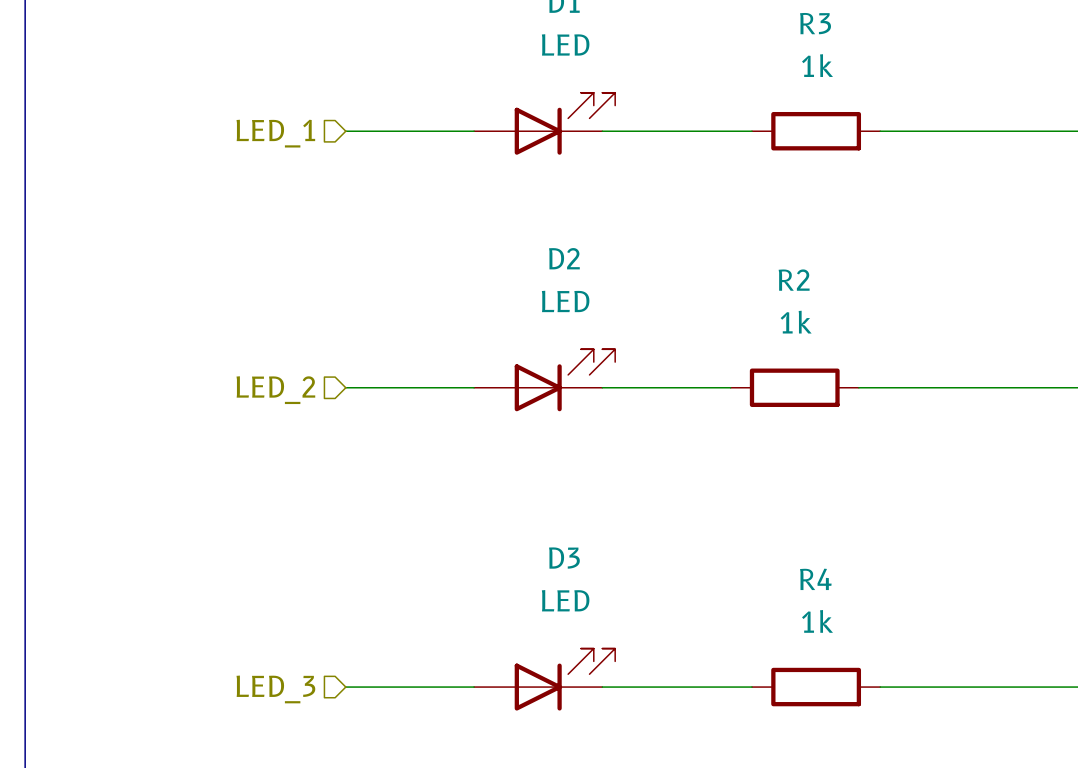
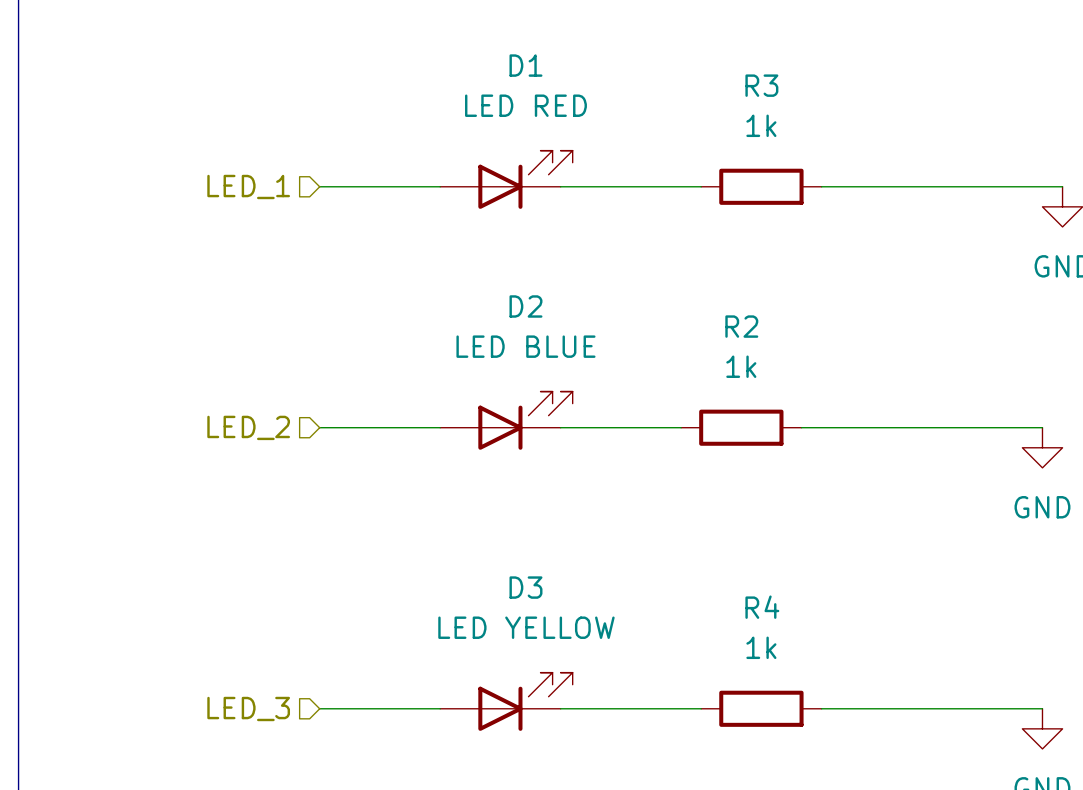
D1 value: LED (565, 44) -> LED RED (525, 105)
D2 value: LED (565, 301) -> LED BLUE (525, 346)
D3 value: LED (565, 600) -> LED YELLOW (526, 627)

